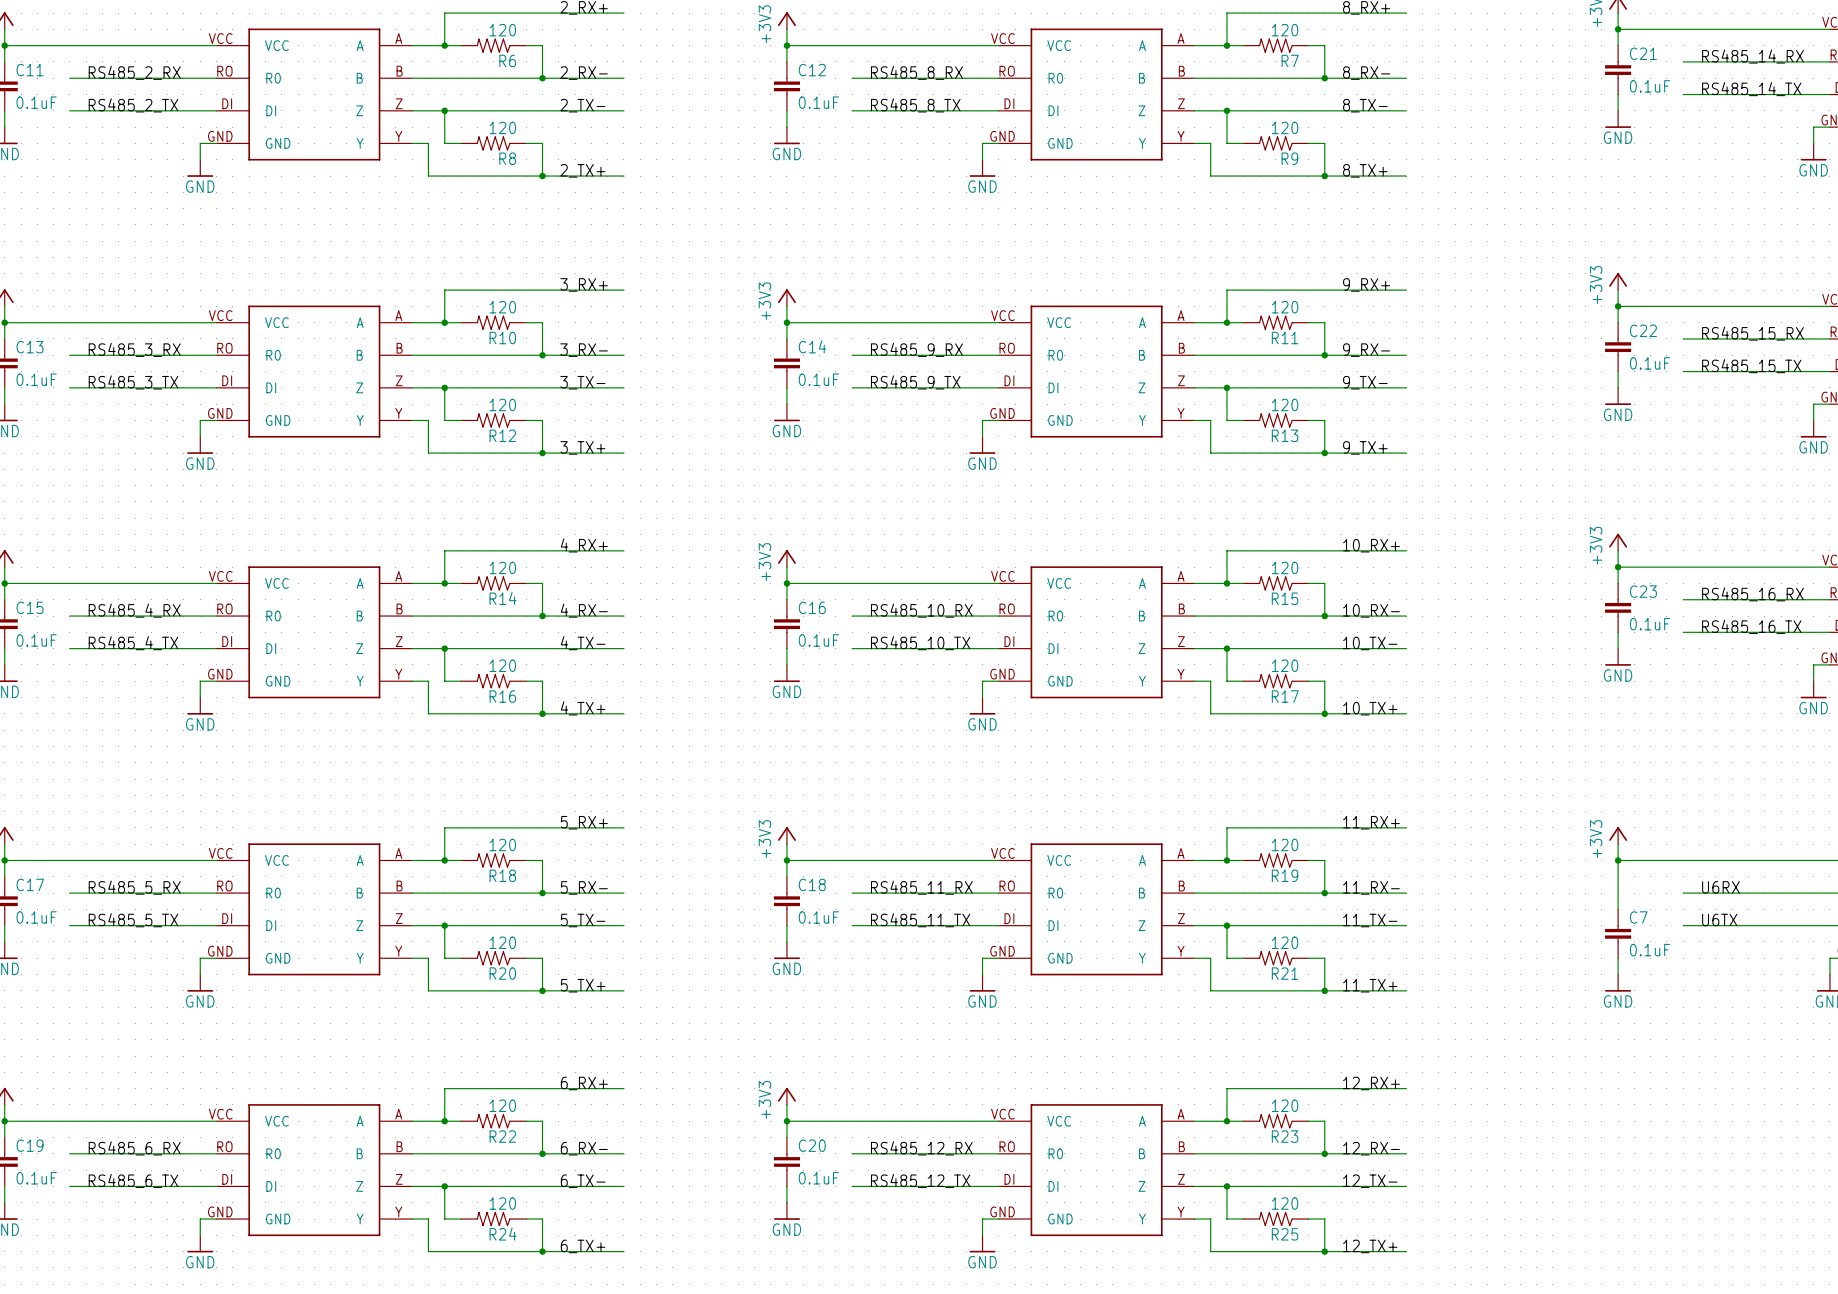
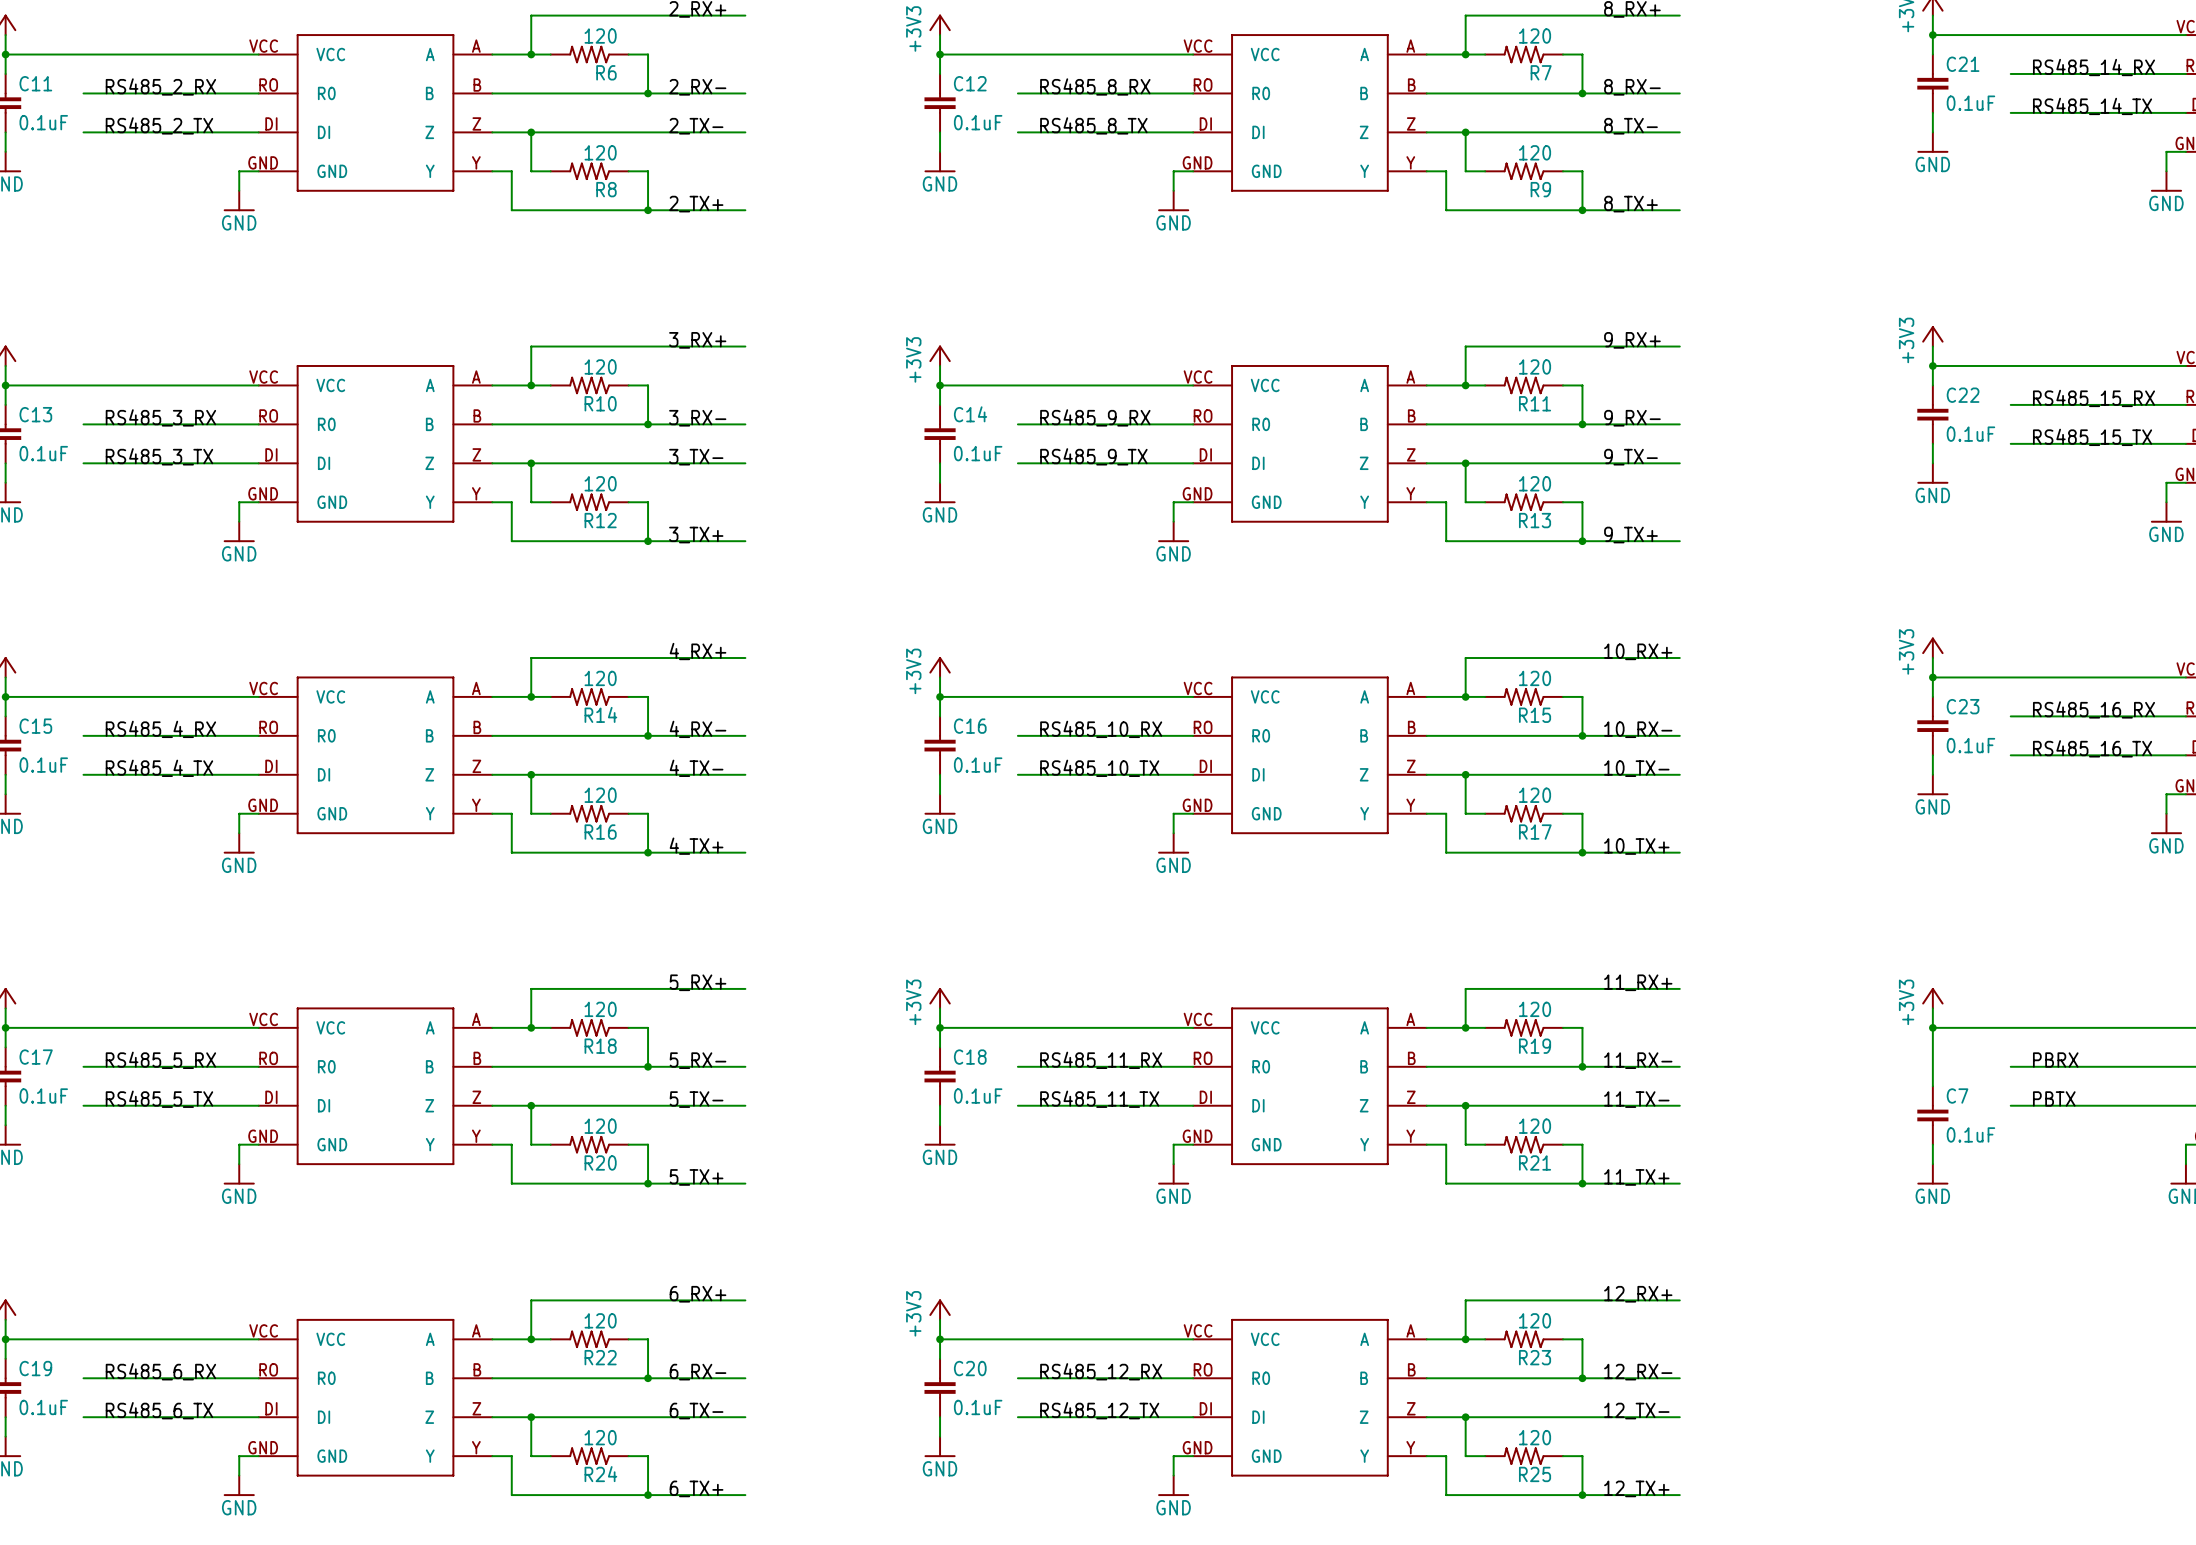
label: U6RX (1720, 887) -> PBRX (2055, 1059)
label: U6TX (1719, 919) -> PBTX (2054, 1098)

